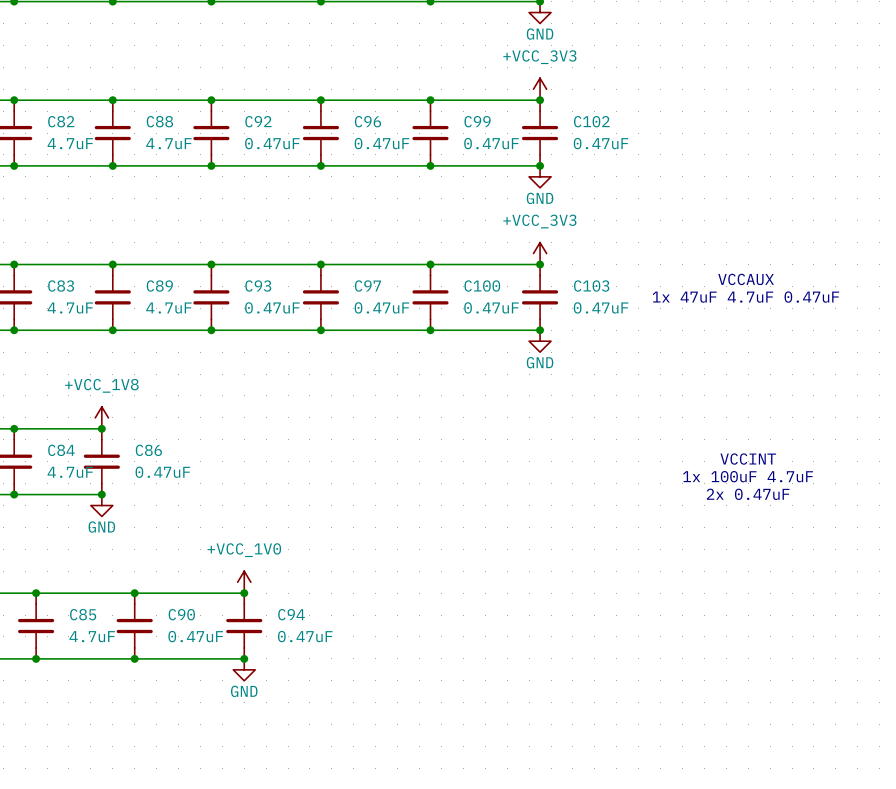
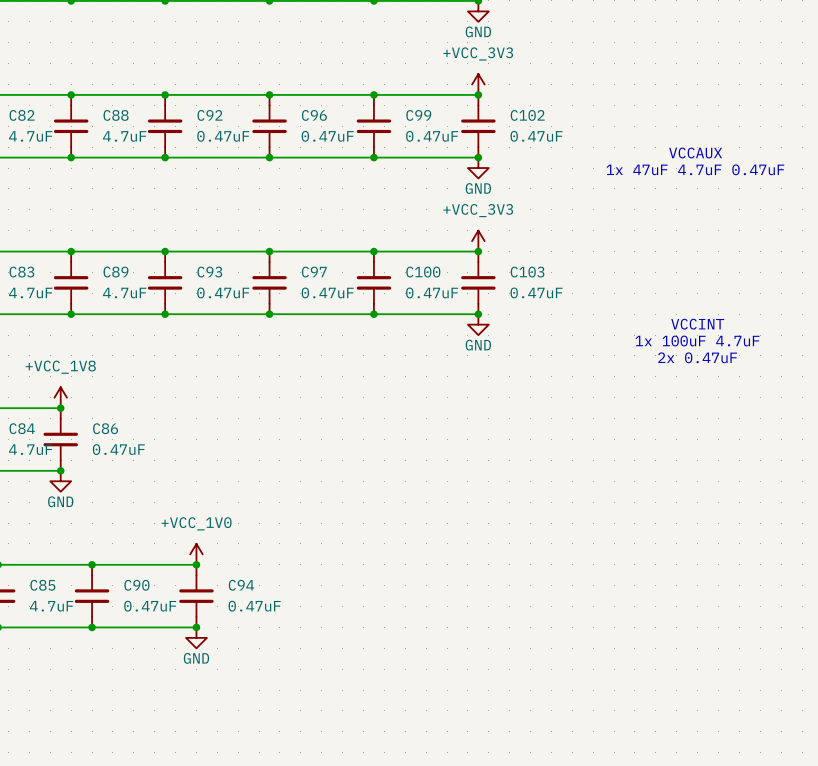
text position: VCCAUX (746, 279) -> VCCAUX (695, 153)
text position: 1x 47uF 4.7uF 0.47uF (745, 297) -> 1x 47uF 4.7uF 0.47uF (695, 169)
text position: VCCINT (748, 459) -> VCCINT (697, 324)
text position: 1x 100uF 4.7uF (748, 476) -> 1x 100uF 4.7uF (697, 341)
text position: 2x 0.47uF (748, 494) -> 2x 0.47uF (697, 357)

